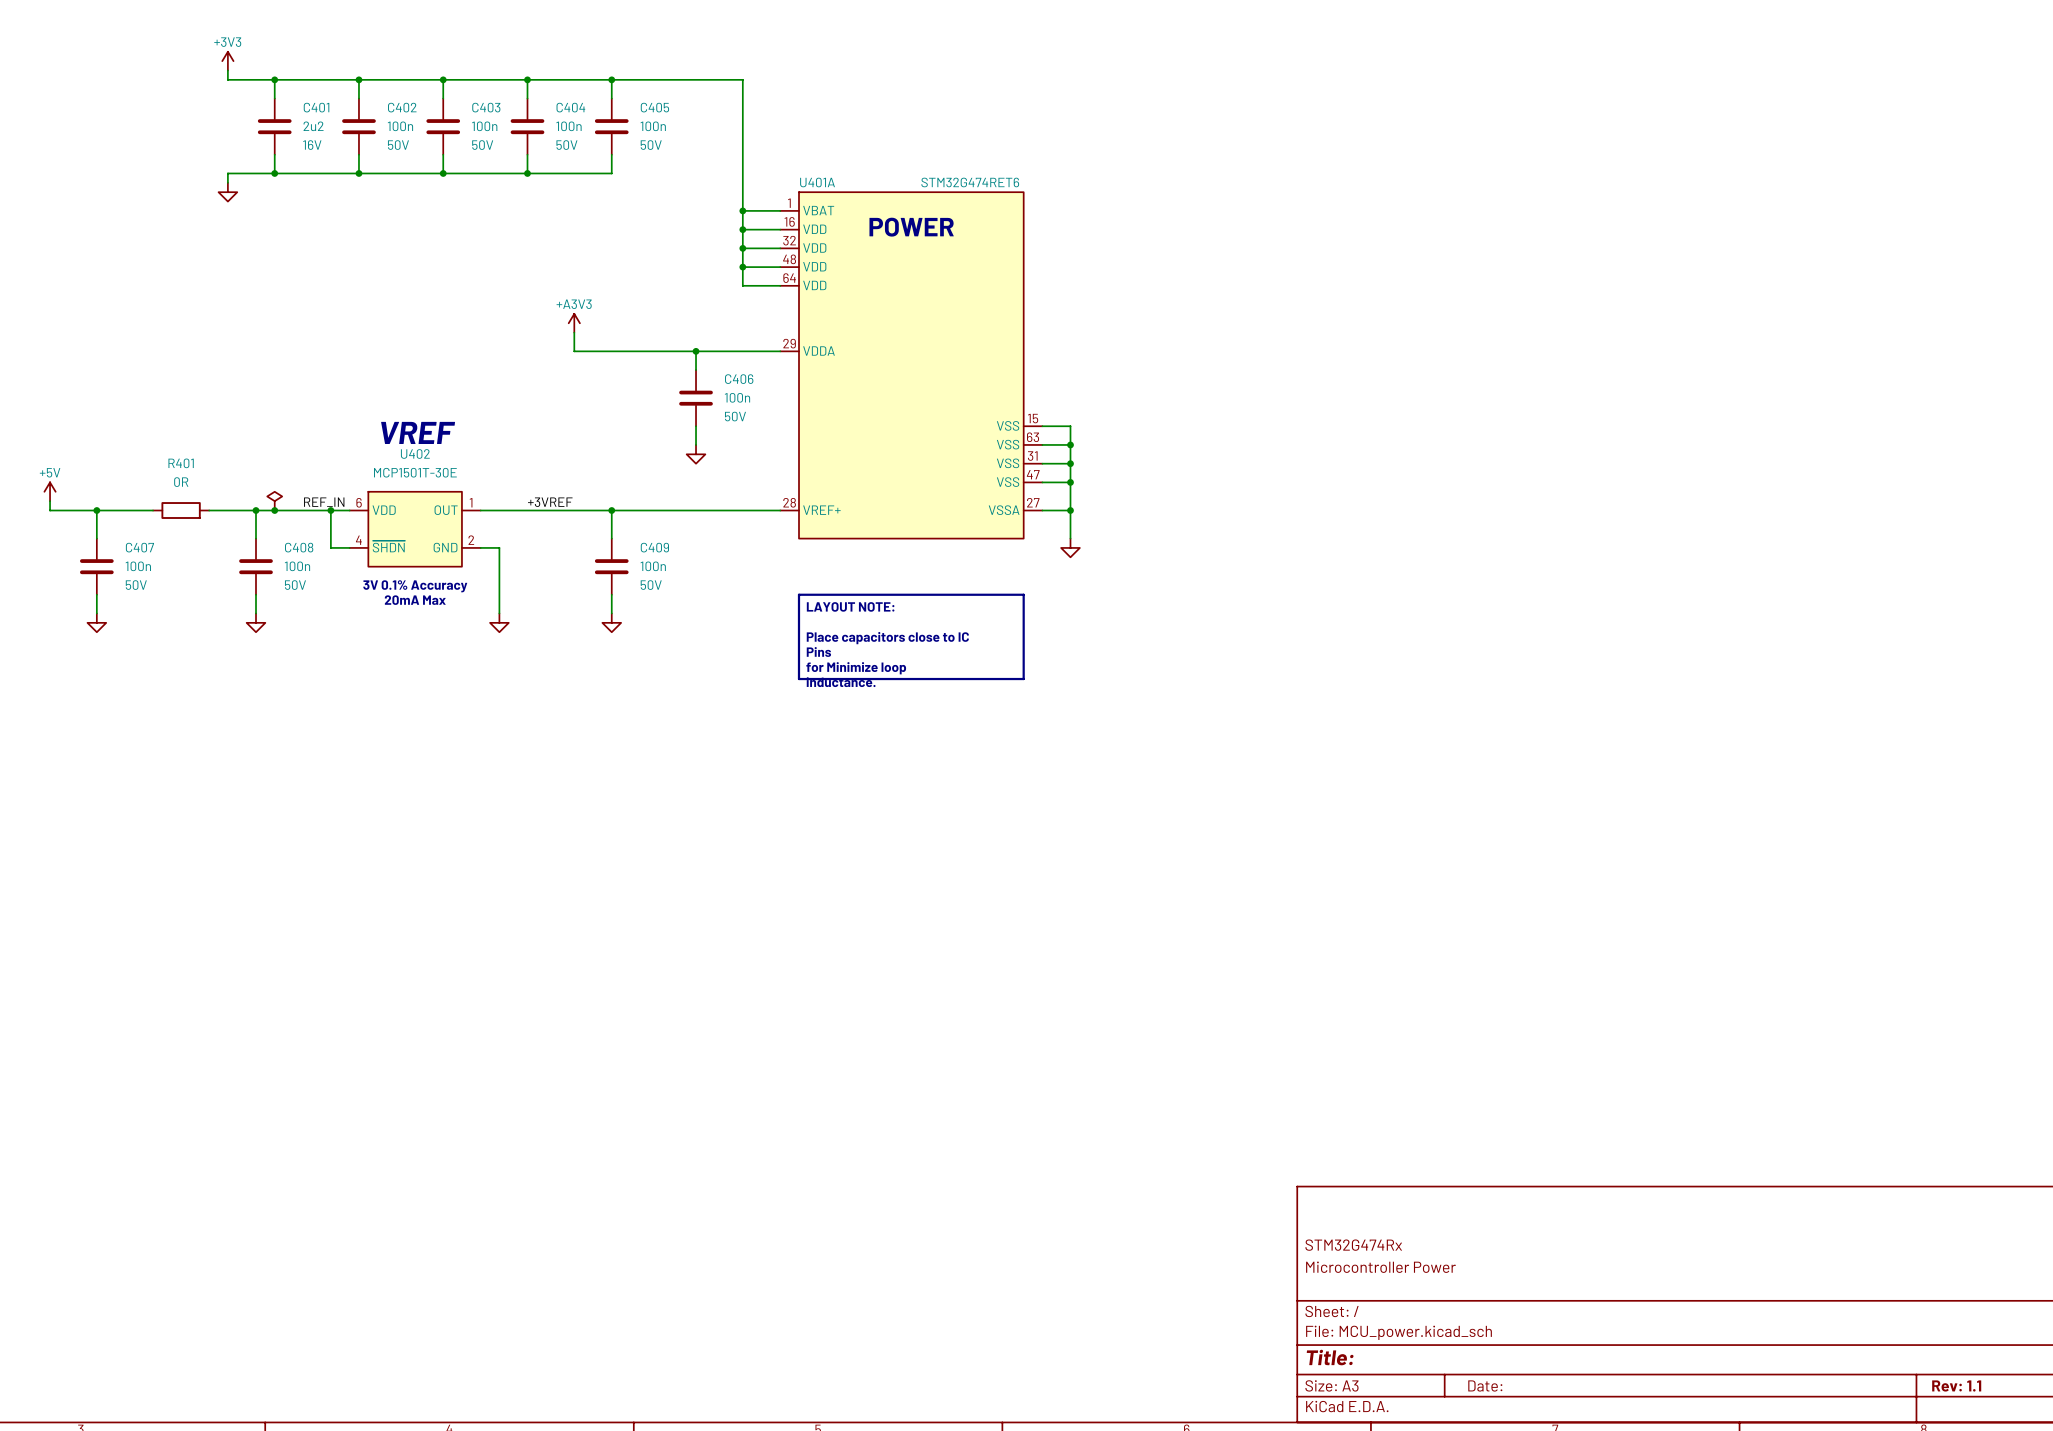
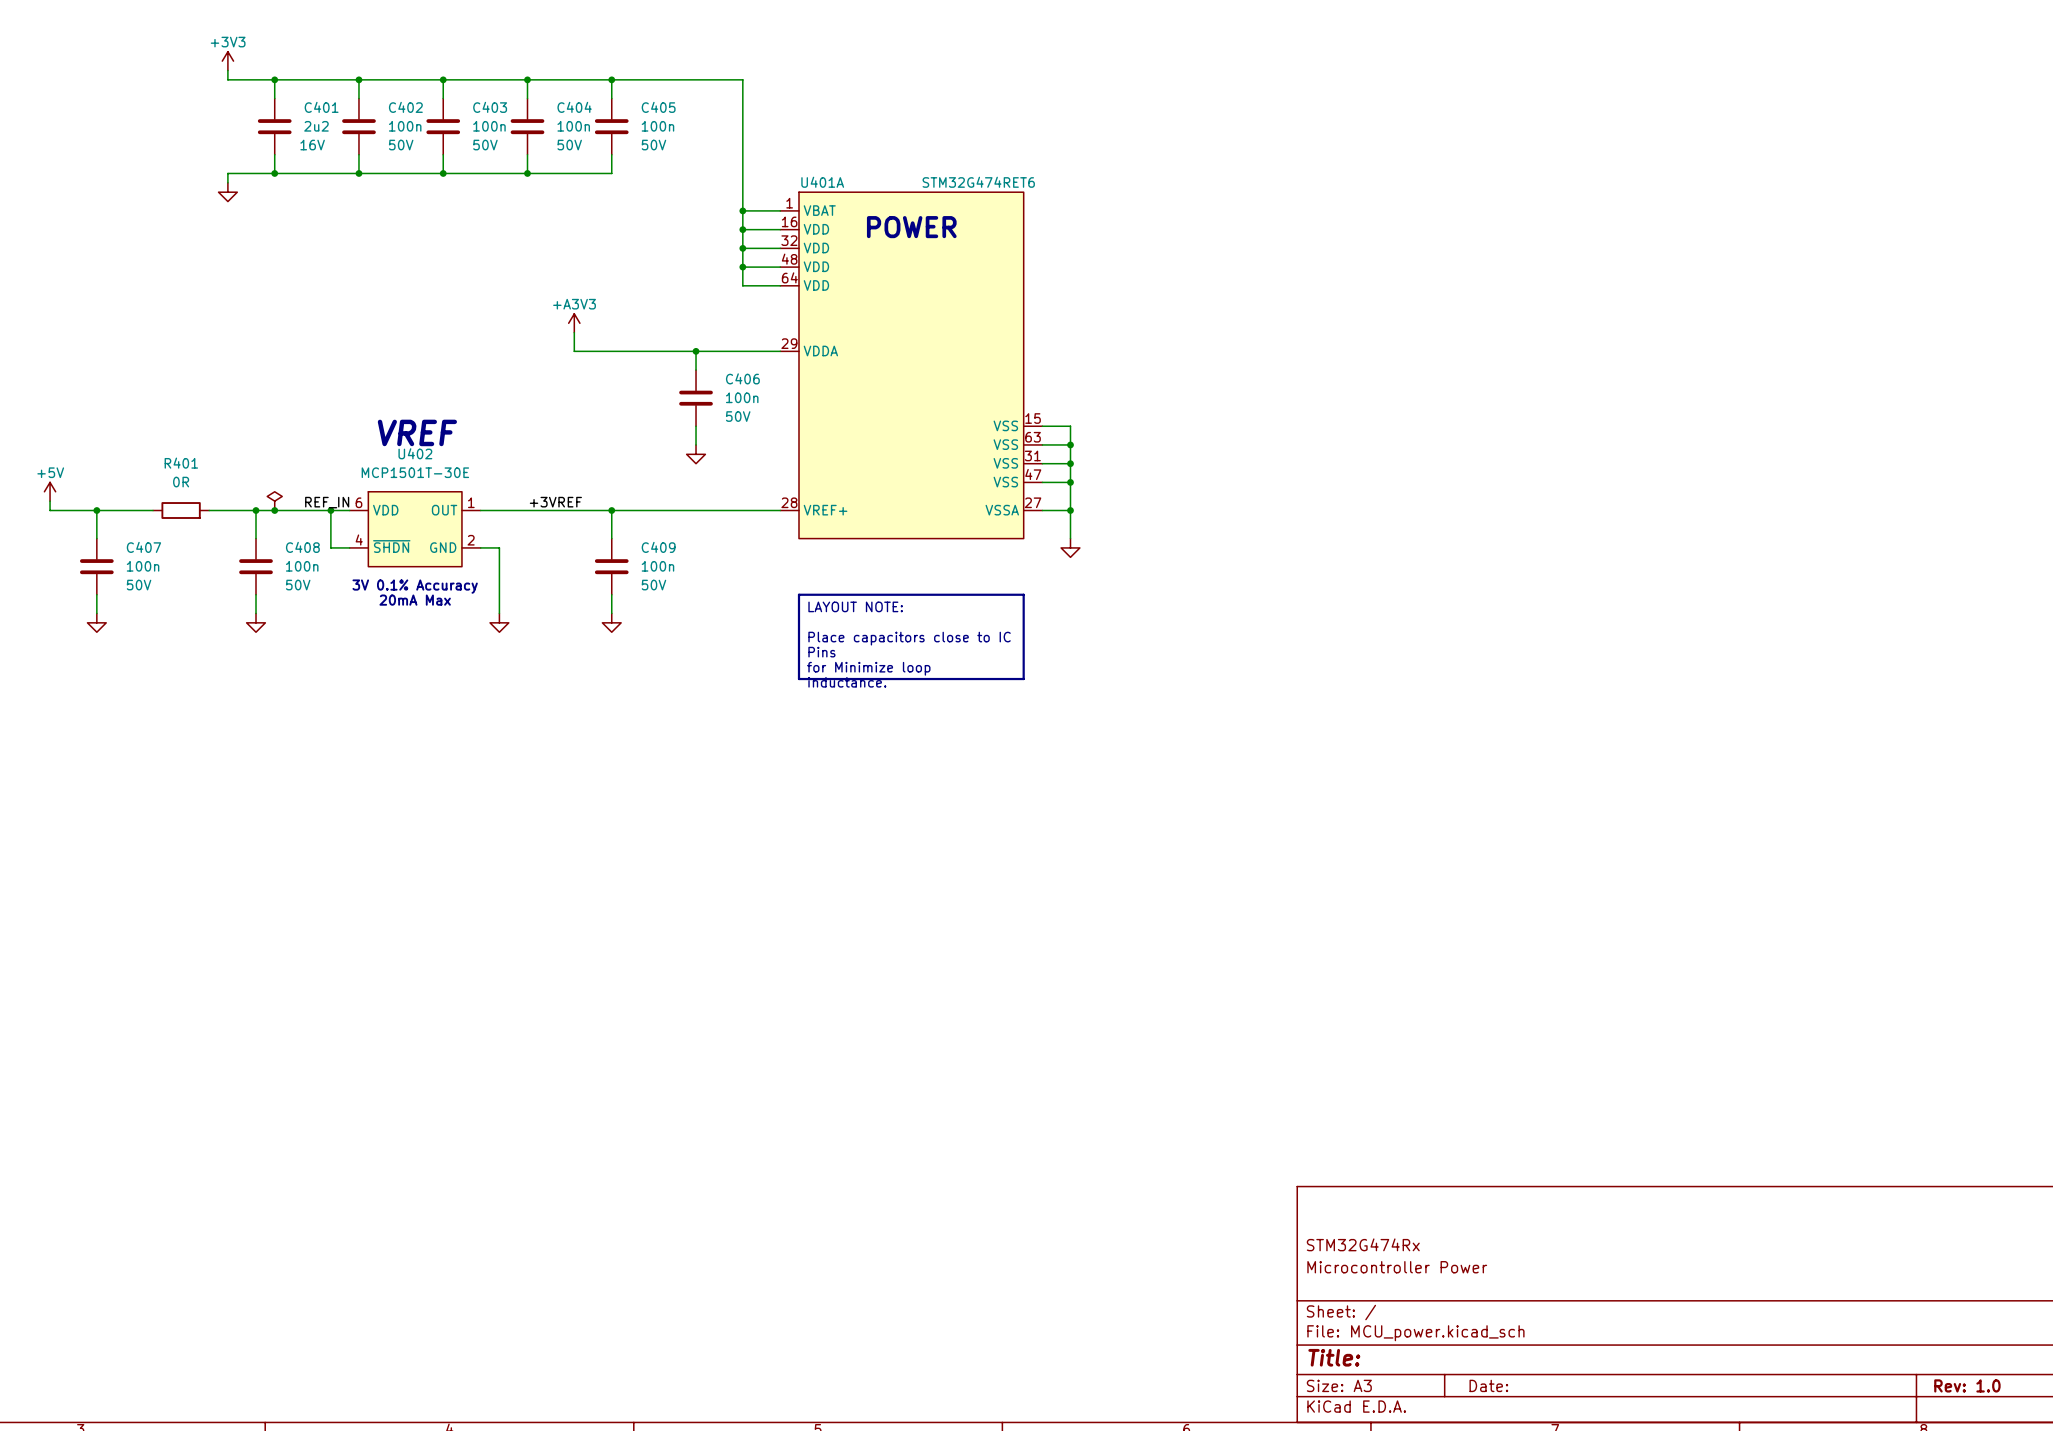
title block: Rev: 1.1 (1956, 1385) -> Rev: 1.0 (1967, 1385)

